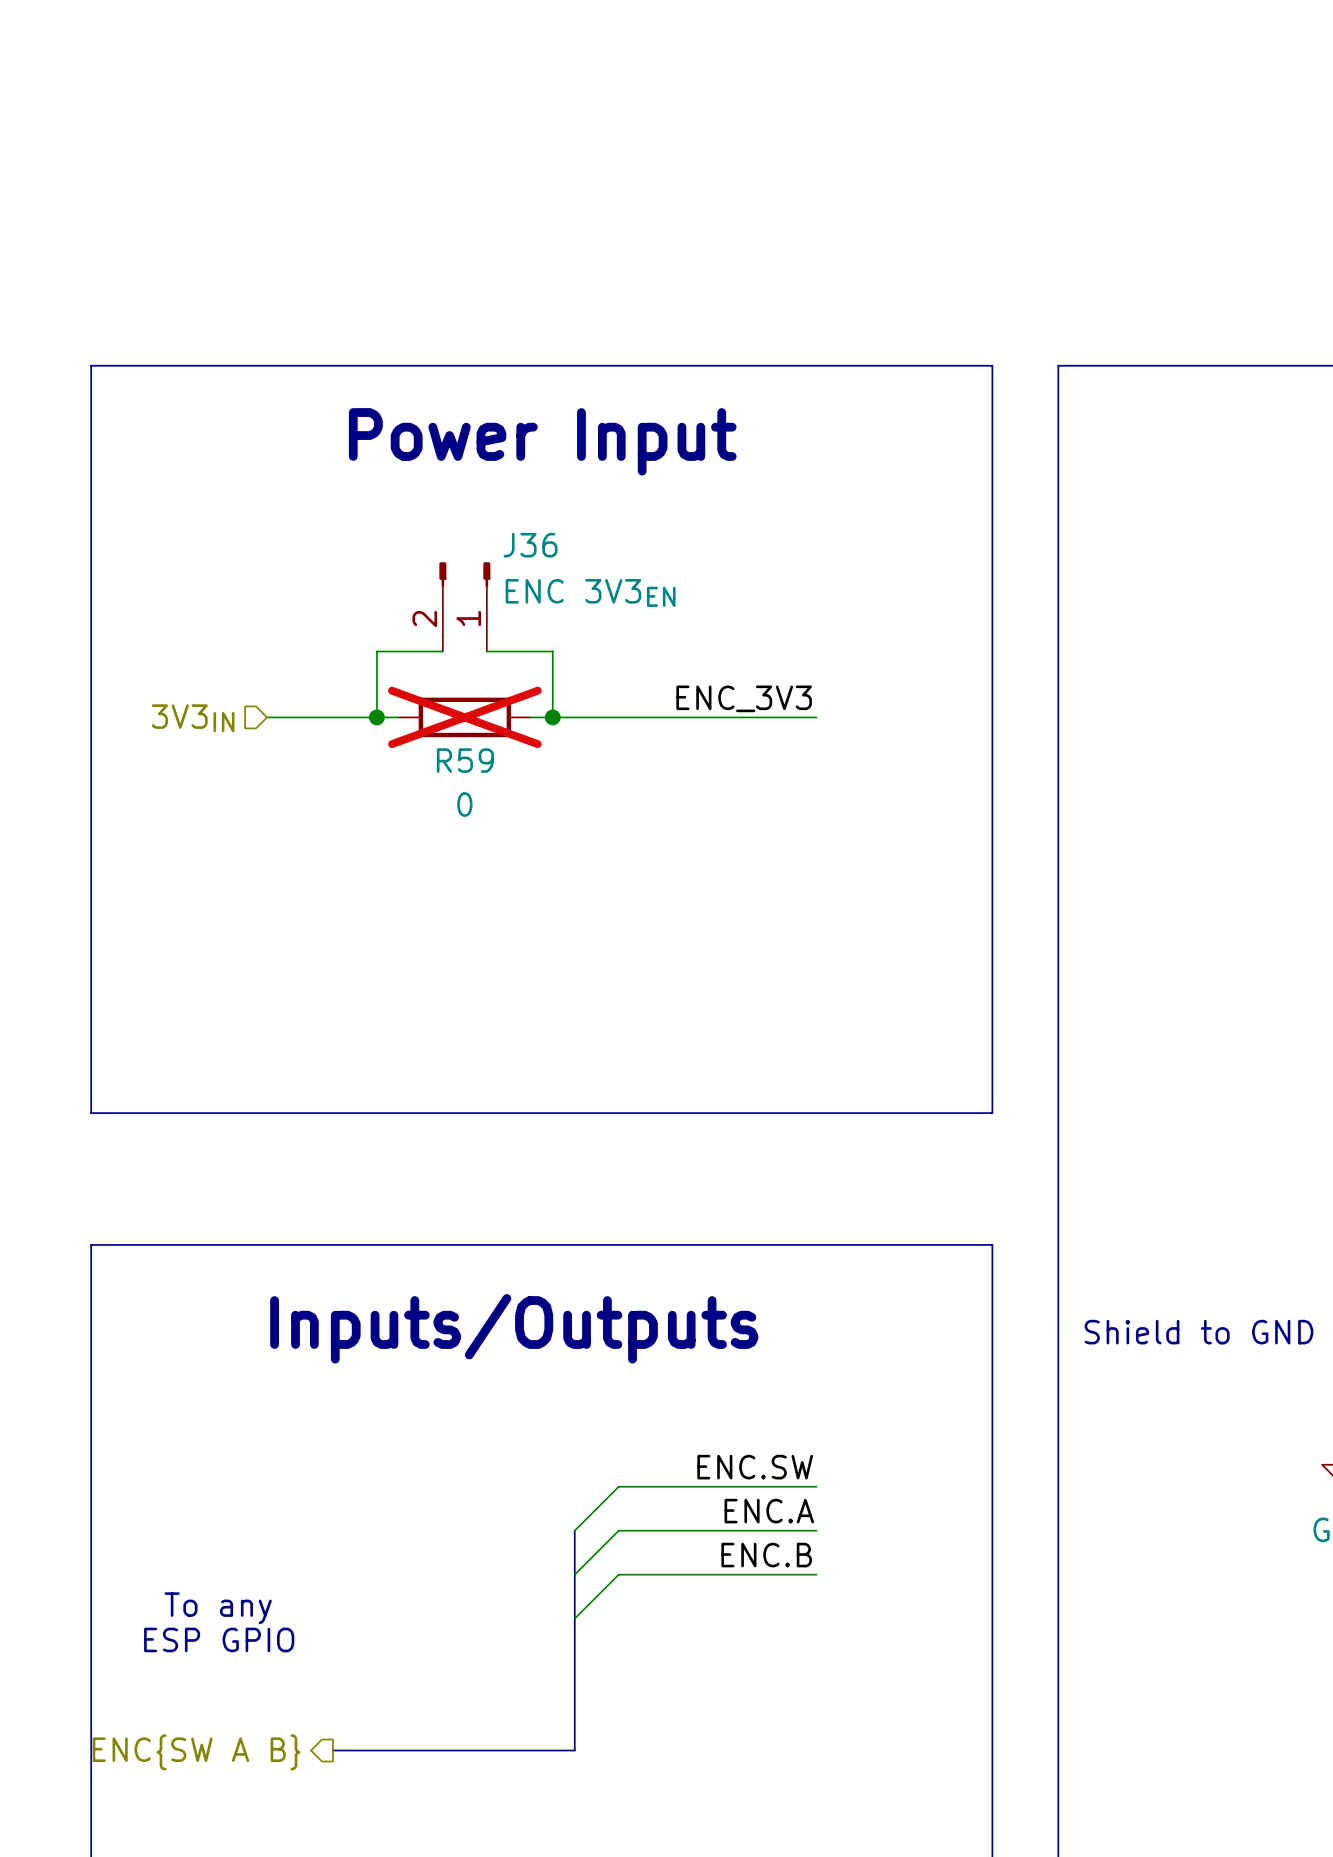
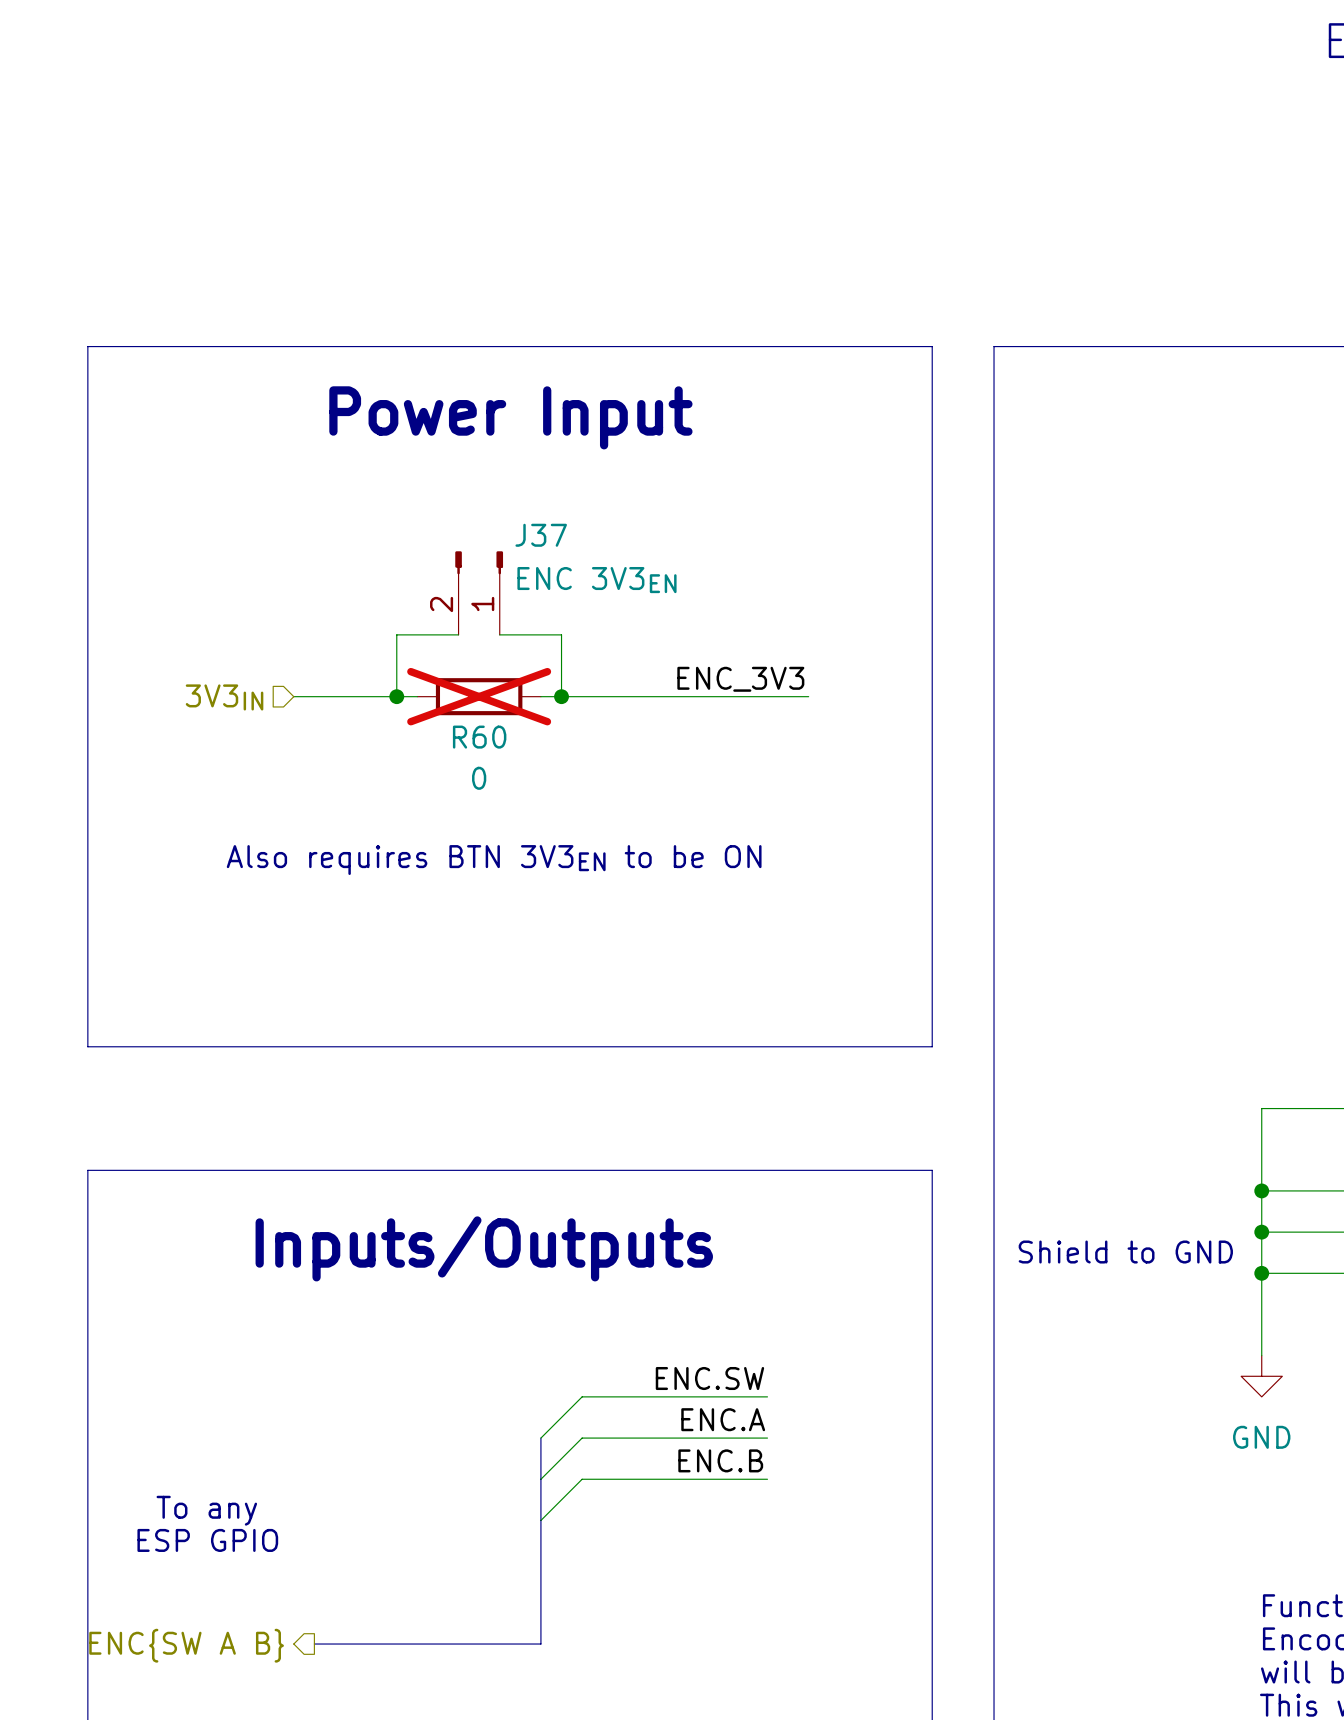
J36: ENC 3V3EN (464, 606) -> none
J37: none -> ENC 3V3EN (479, 593)
wire: (442, 651) (376, 651) (376, 717) -> (458, 634) (396, 634) (396, 696)
wire: (486, 651) (552, 651) (552, 717) -> (499, 634) (561, 634) (561, 696)
label position: ENC_3V3 (744, 698) -> ENC_3V3 (740, 679)
wire: (267, 717) (398, 717) -> (293, 696) (417, 696)
junction position: (376, 717) -> (396, 696)
R59: 0 (464, 717) -> none
wire: (530, 717) (816, 717) -> (540, 696) (808, 696)
junction position: (552, 717) -> (561, 696)
hierarchical label position: 3V3IN (193, 718) -> 3V3IN (224, 697)
R60: none -> 0 (479, 696)
text: none -> Also requires BTN 3V3EN to be ON (494, 860)

